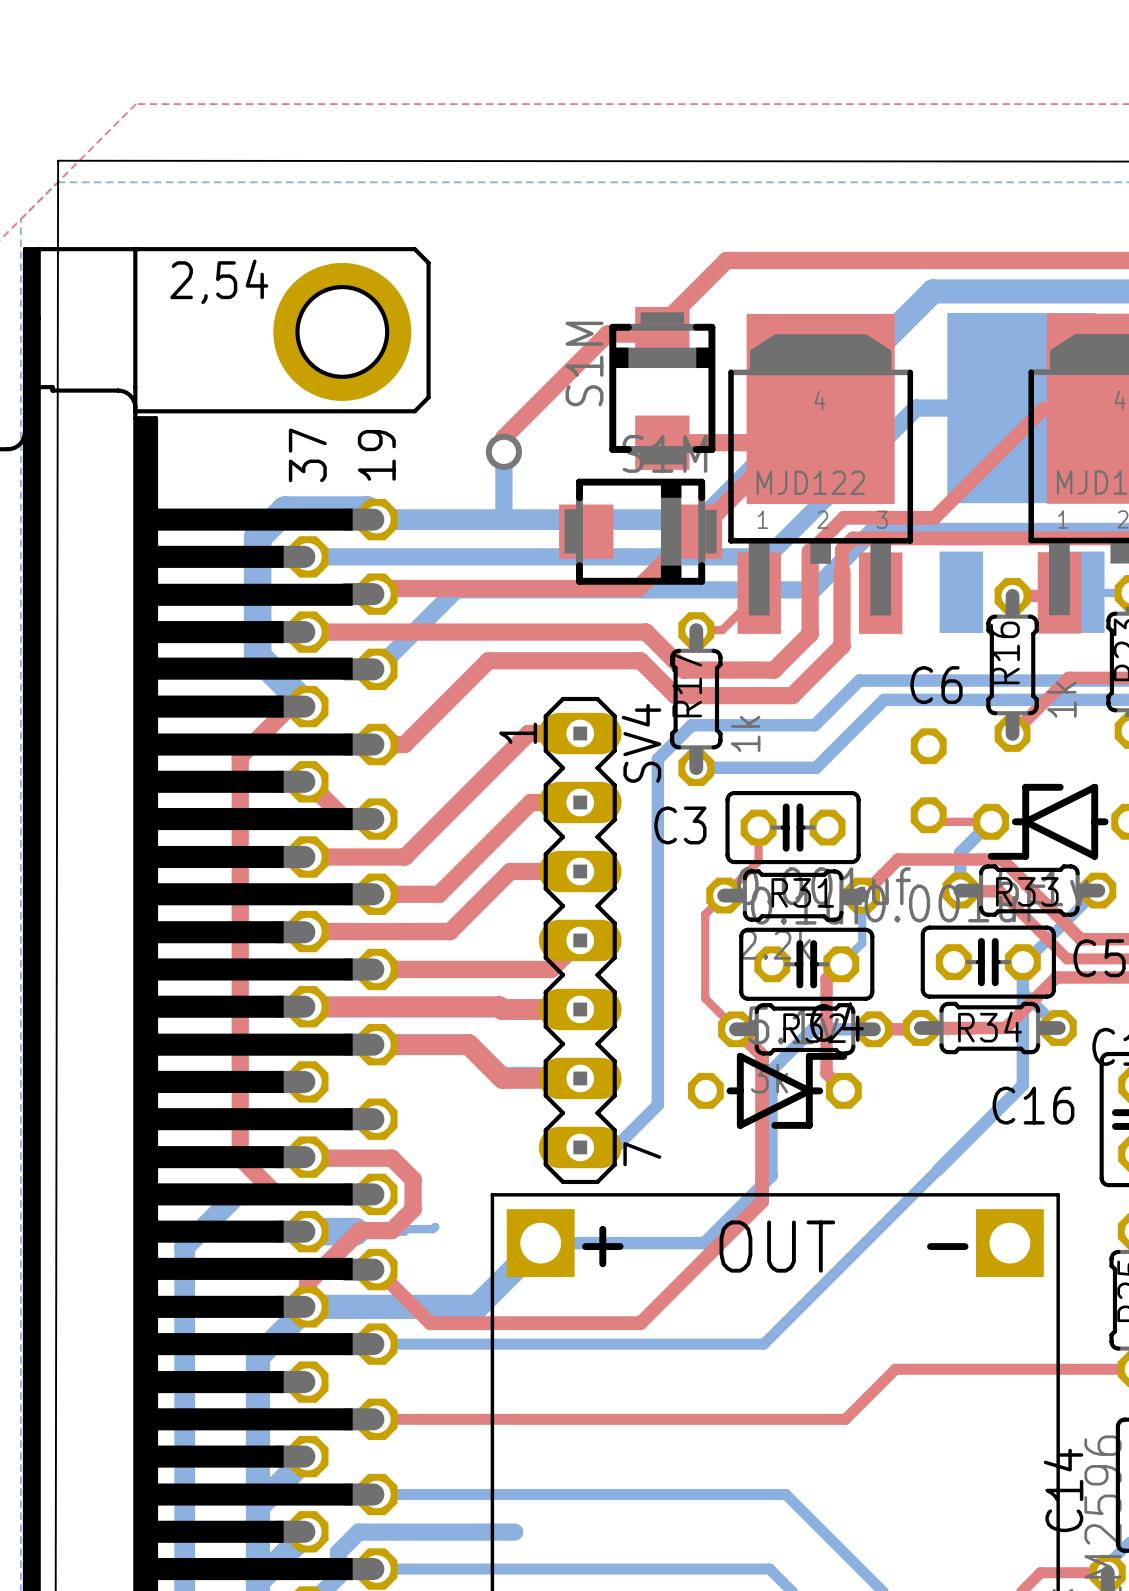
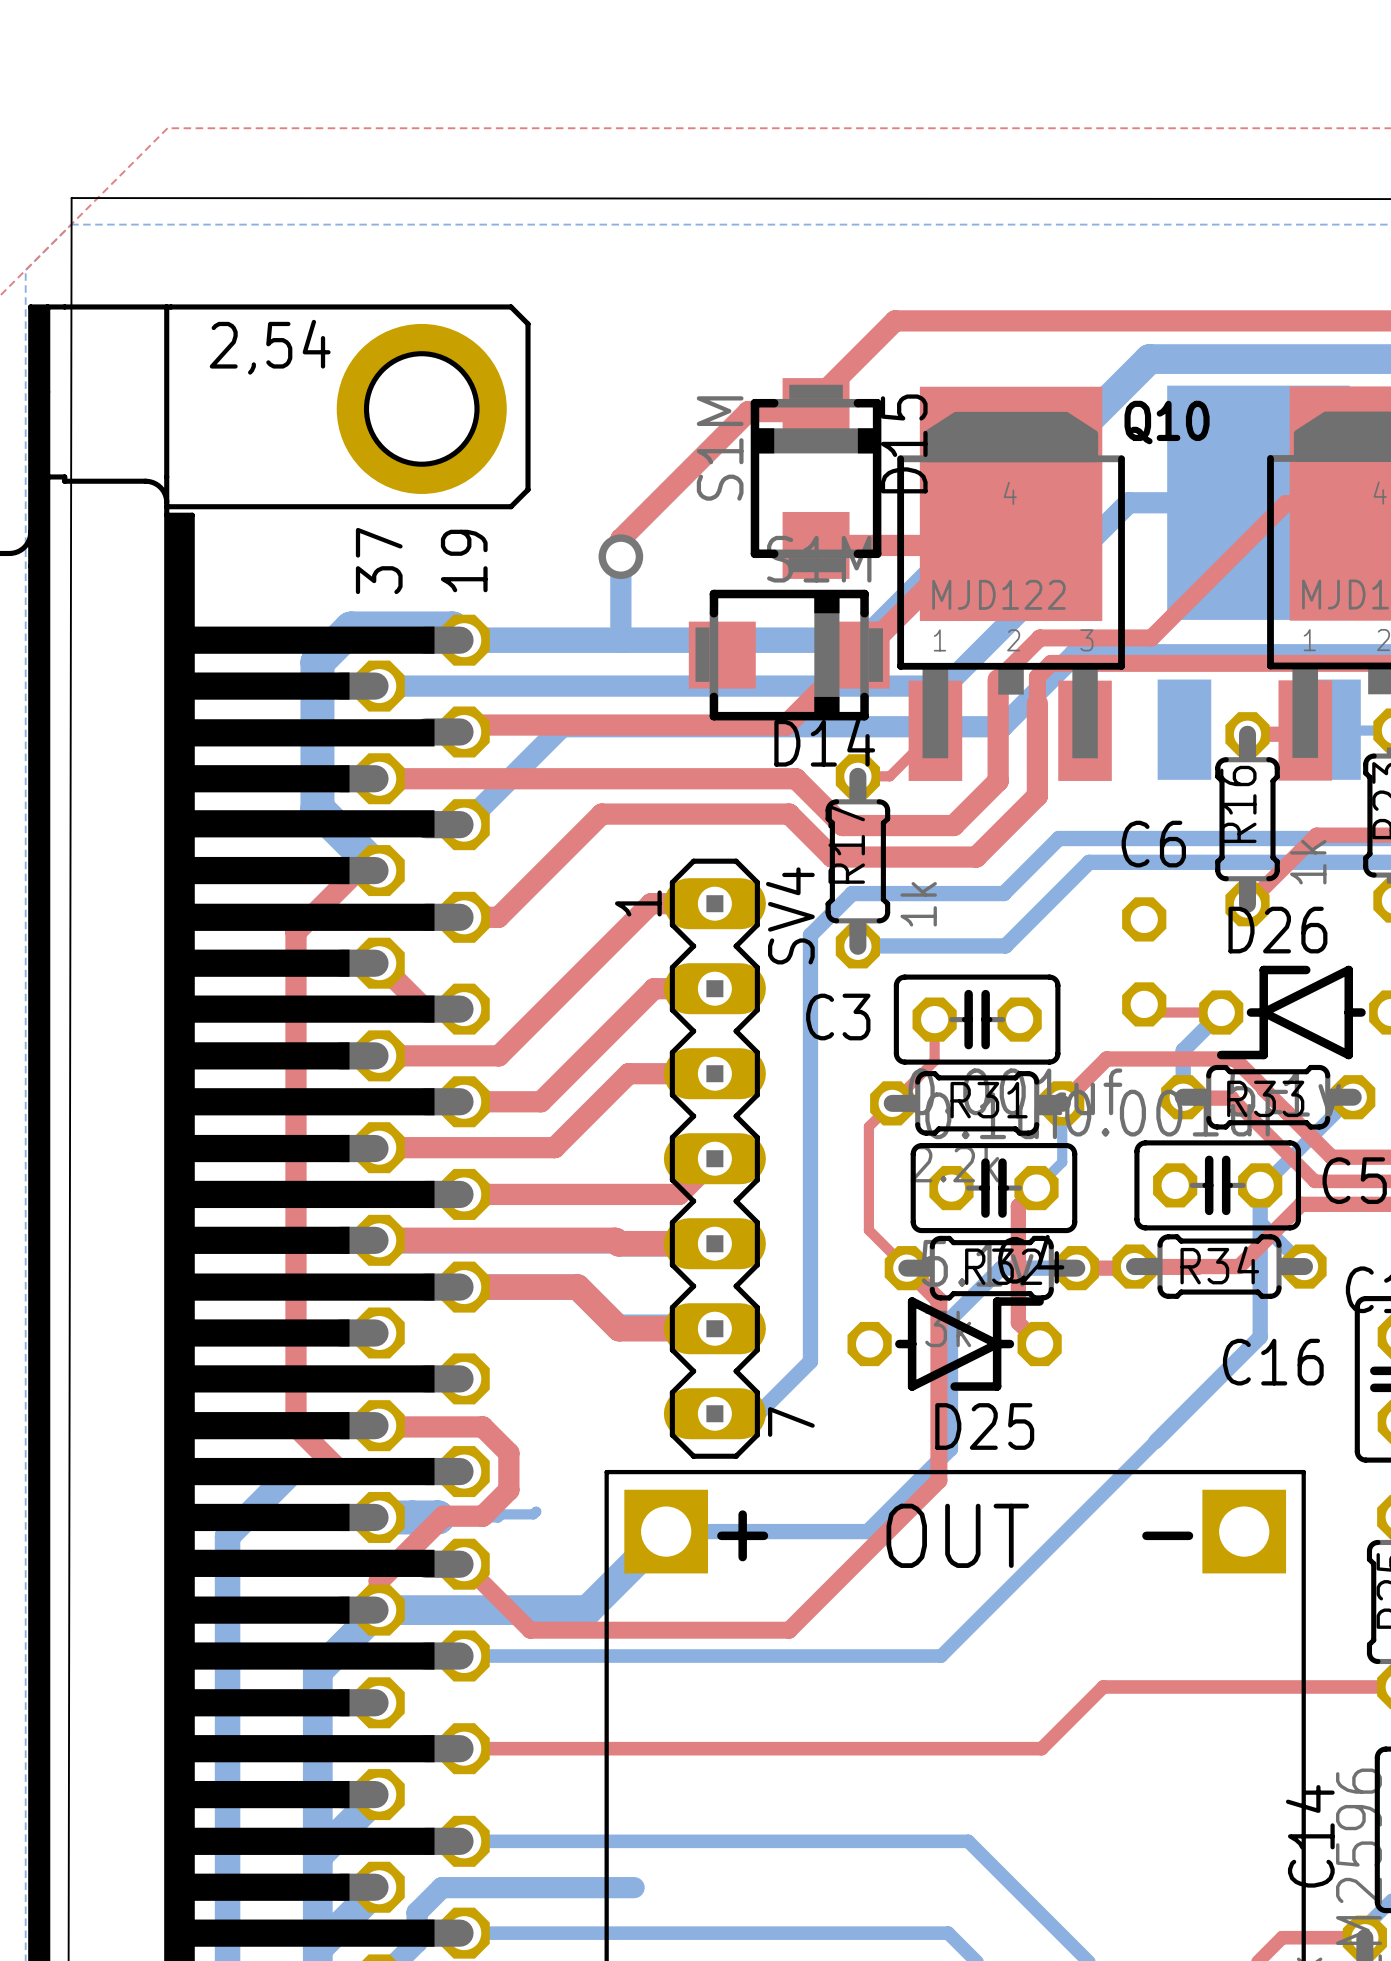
Q10 name: none -> Q10 (1167, 422)
D15 name: none -> D15 (904, 443)
D14 name: none -> D14 (824, 742)
D26 name: none -> D26 (1277, 930)
D25 name: none -> D25 (984, 1426)

